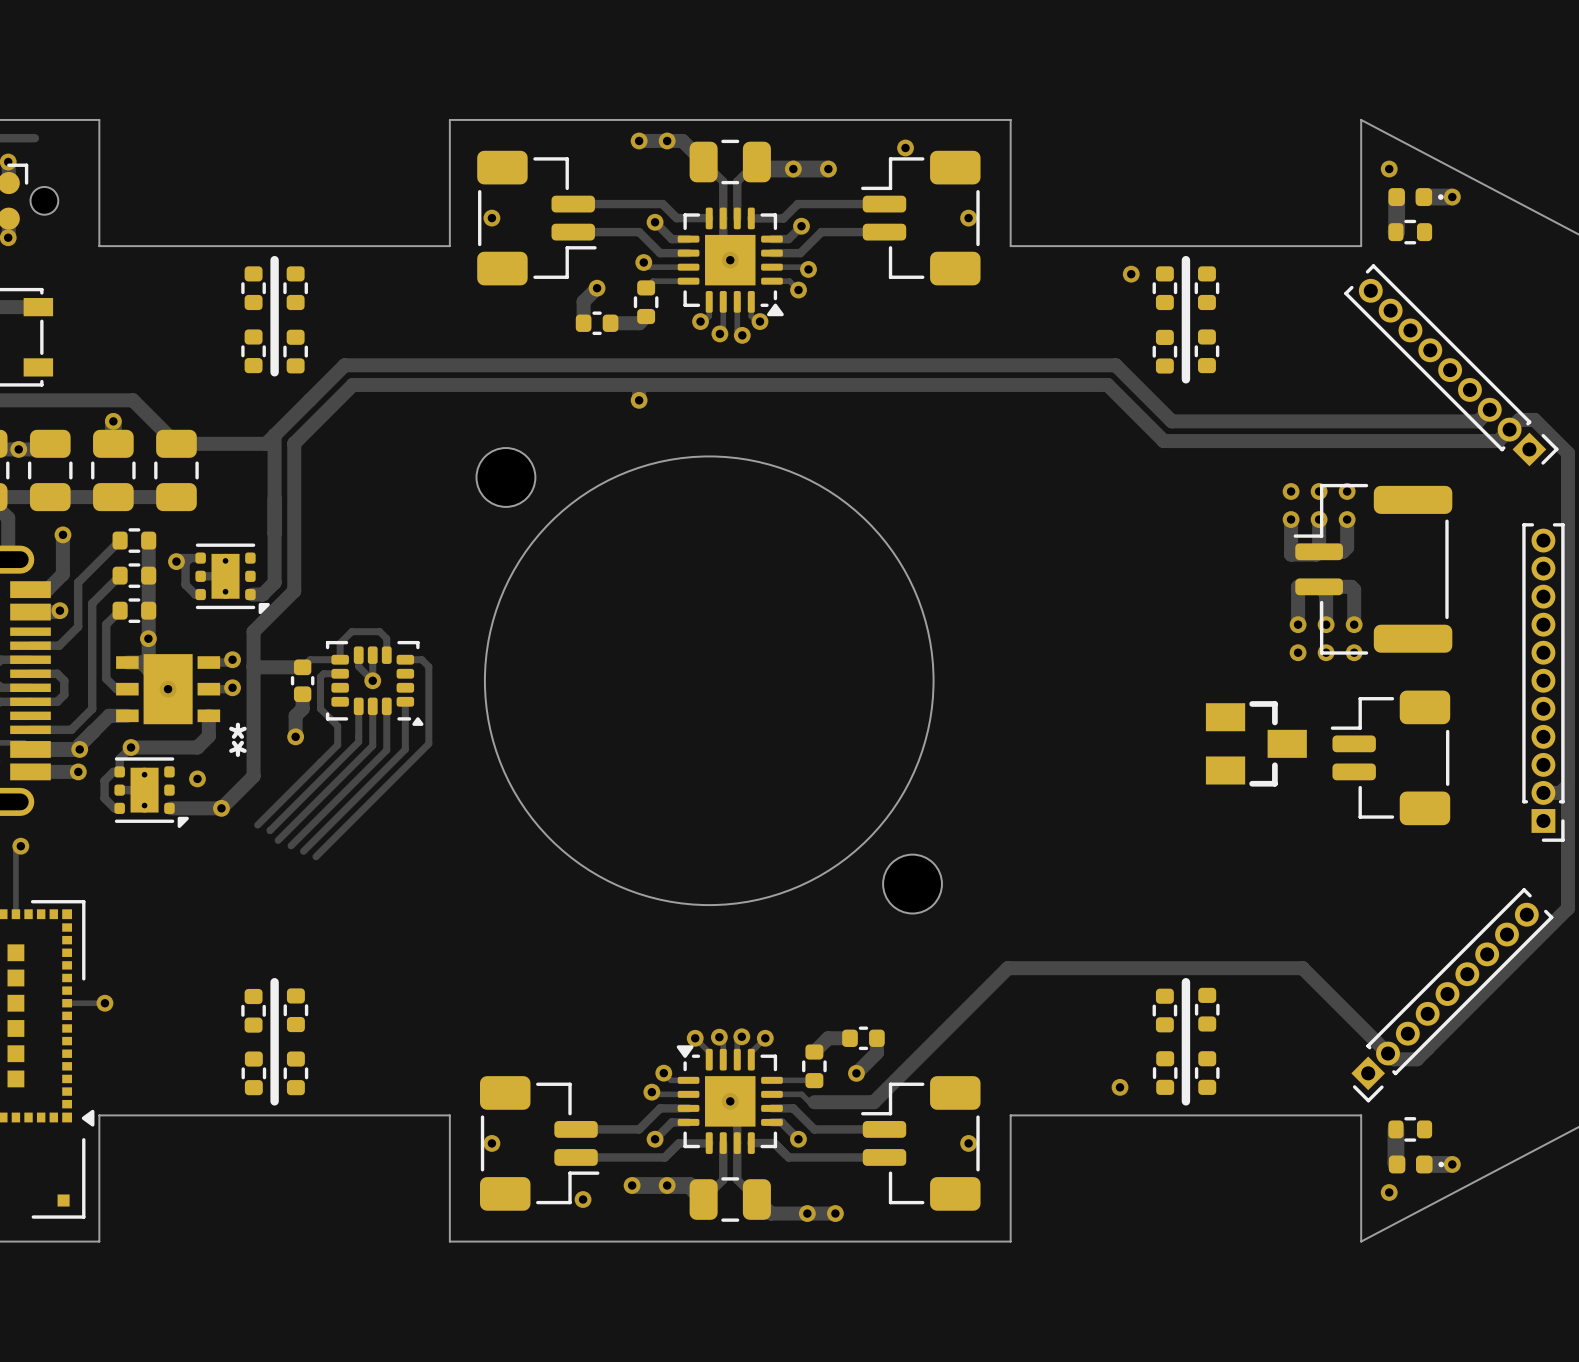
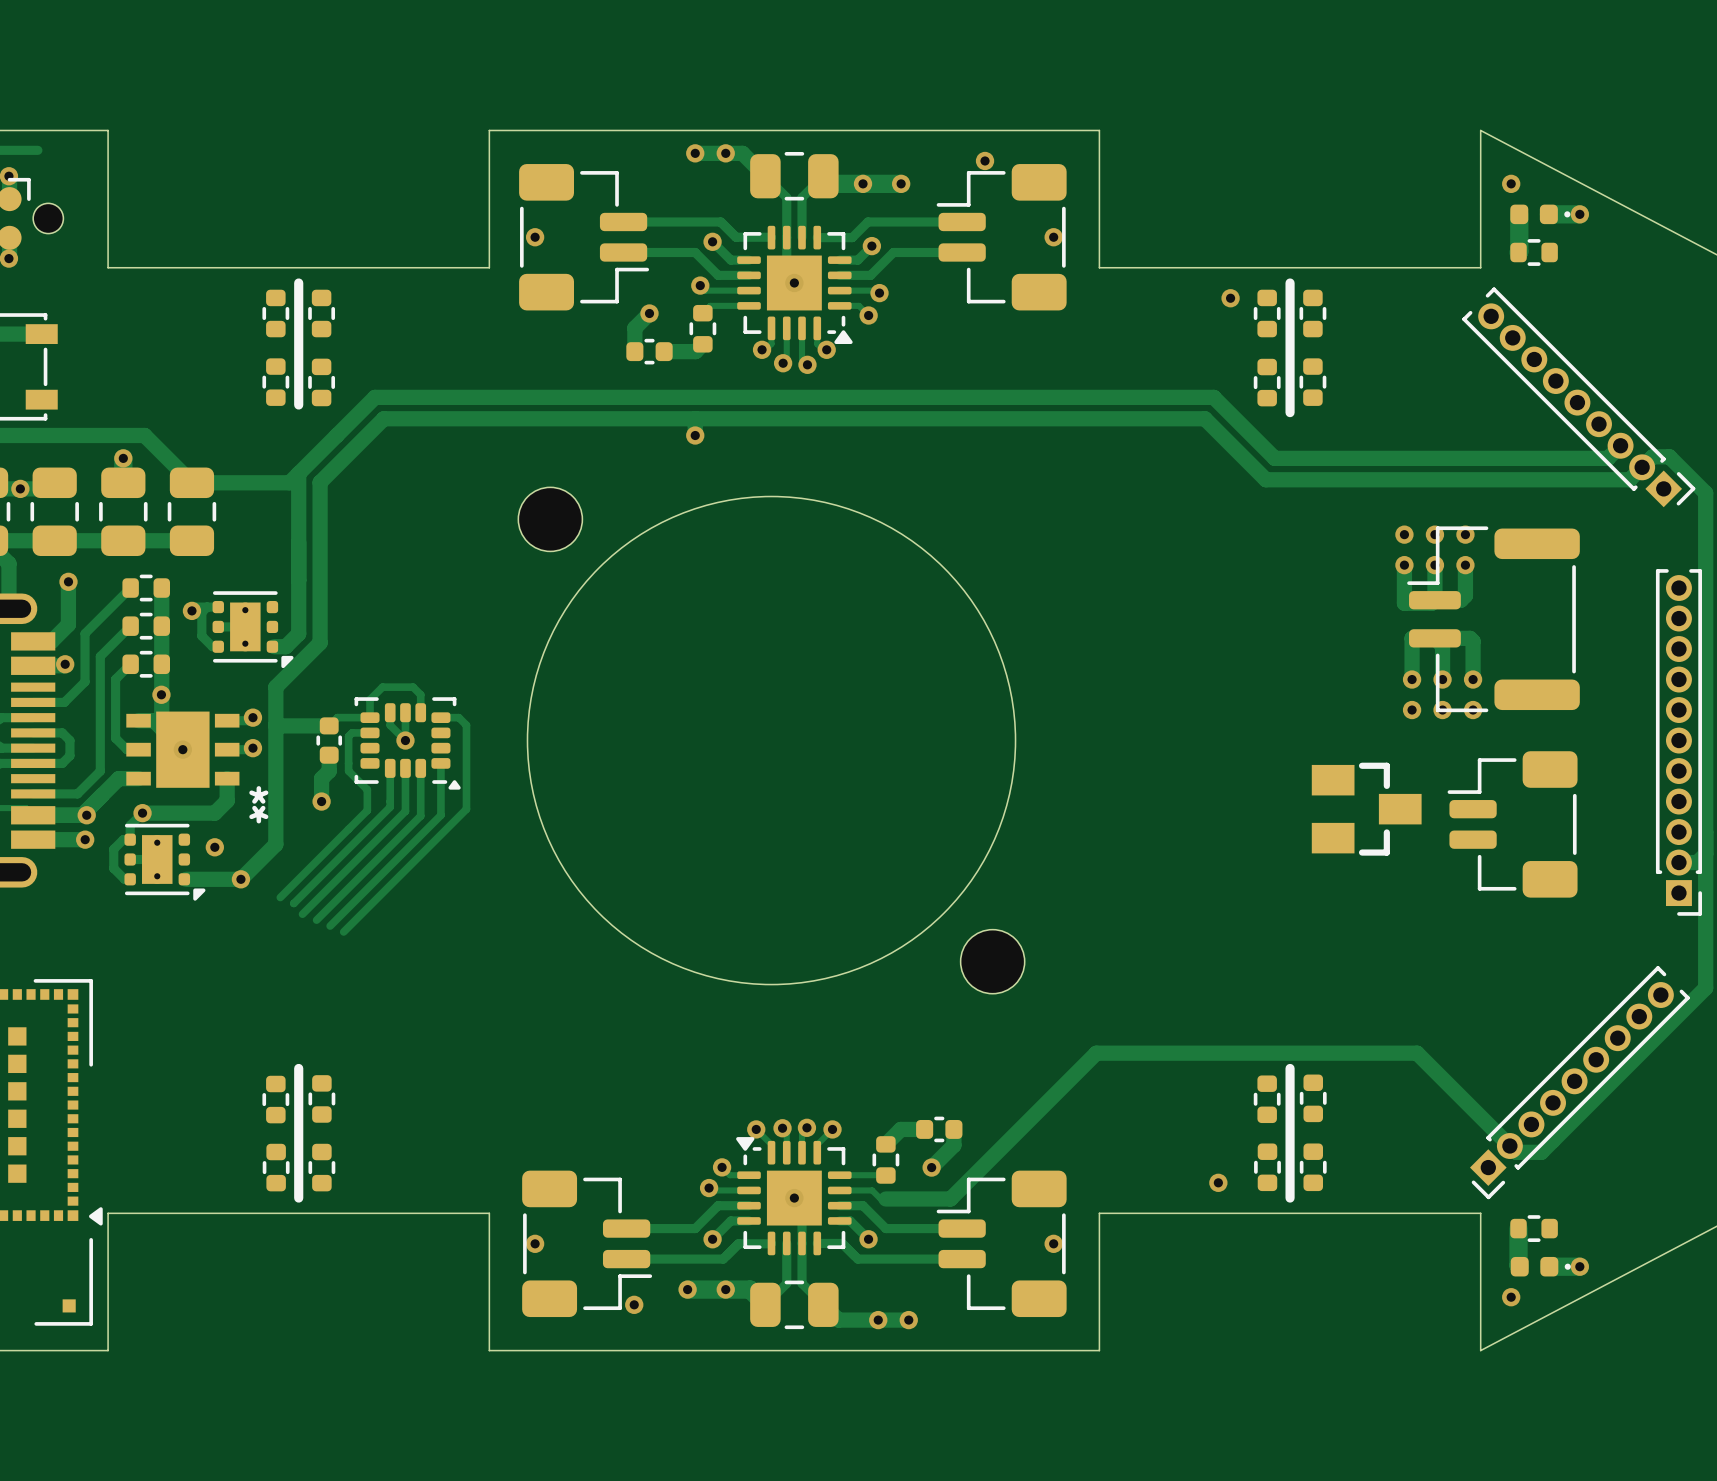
track: (20, 846) (15, 851) (15, 914) -> none
via: (20, 846) -> none
track: (67, 1003) (104, 1003) -> none
via: (104, 1003) -> none

